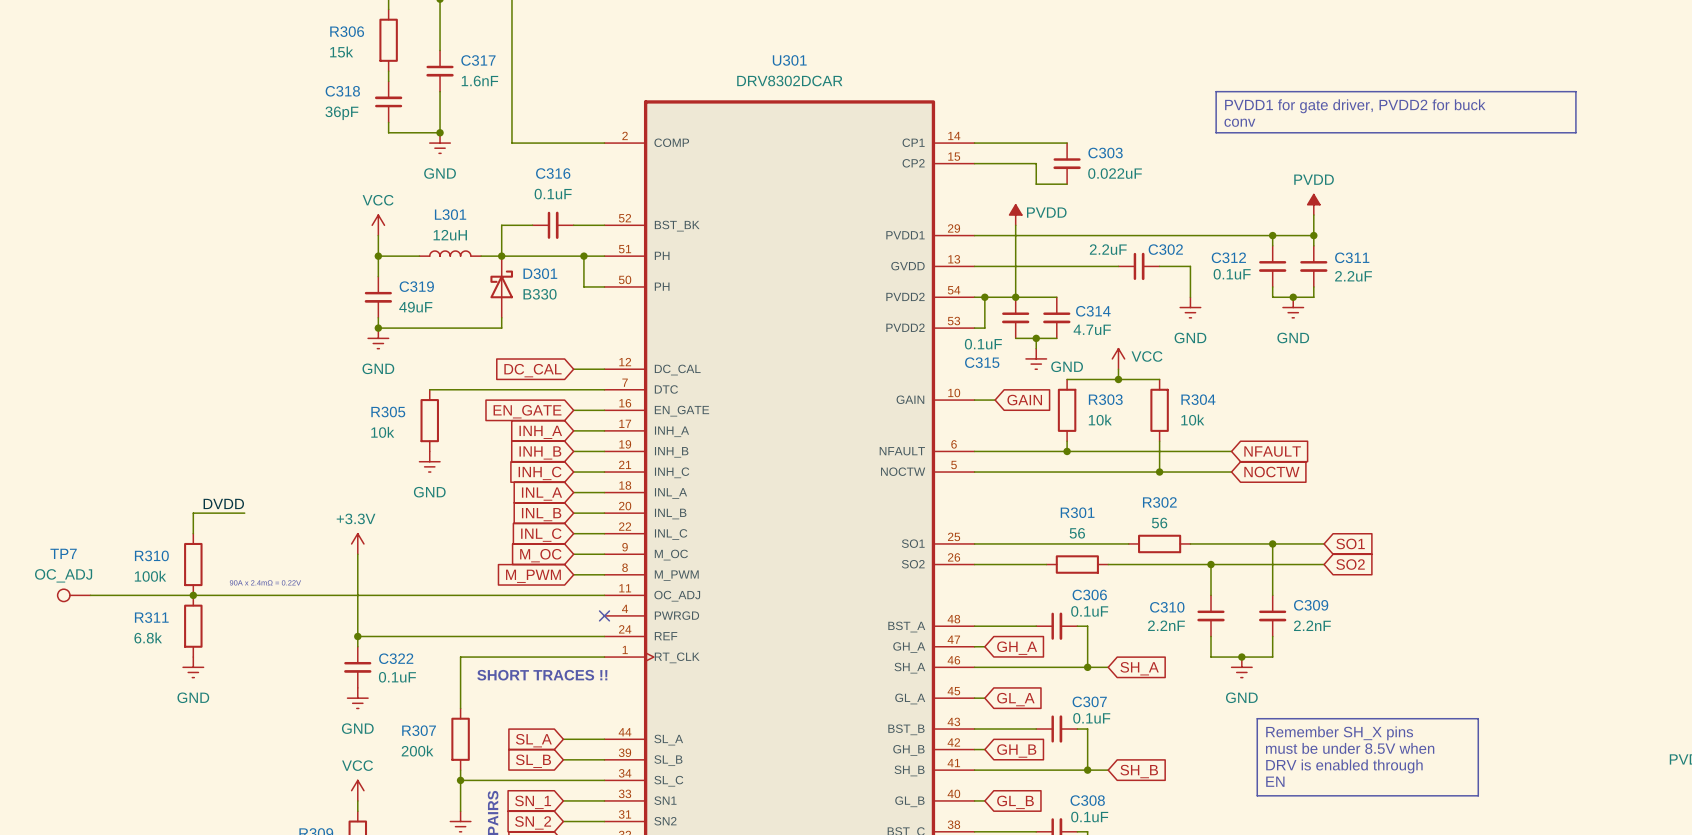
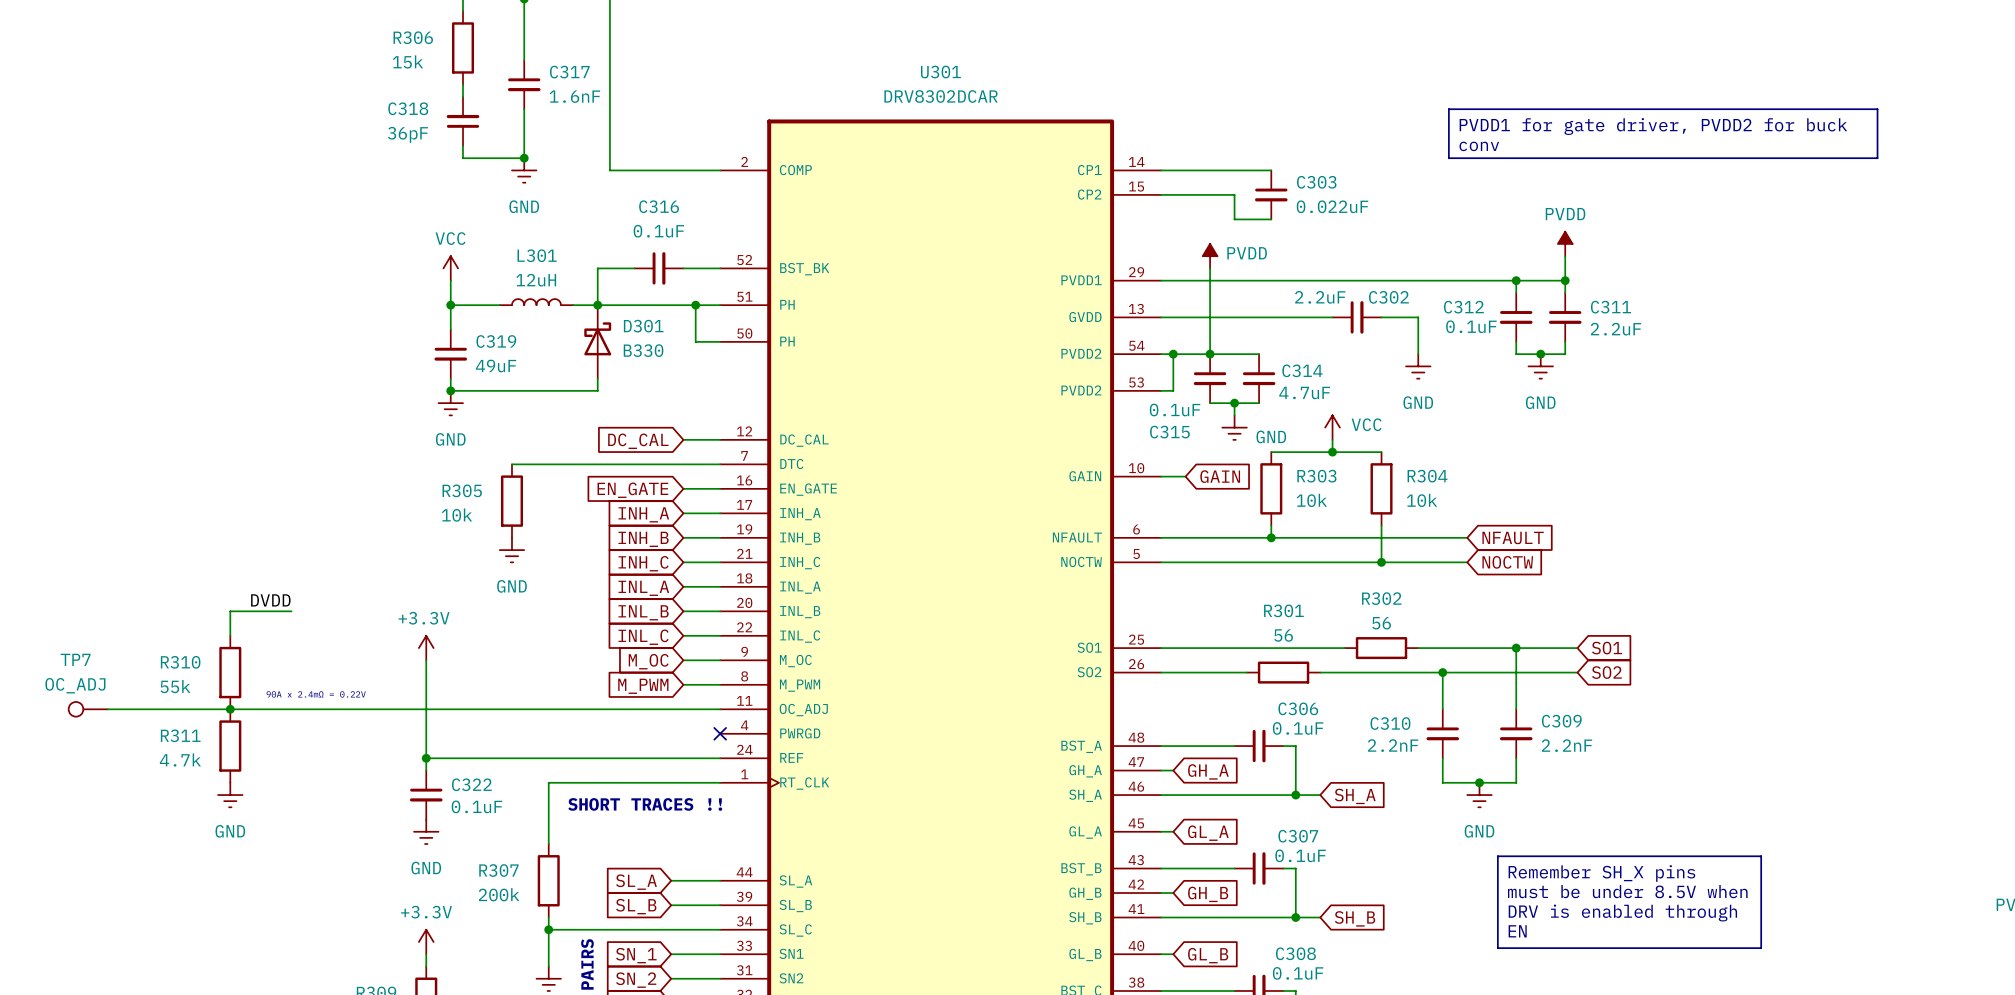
R310 value: 100k (150, 576) -> 55k (175, 686)
R311 value: 6.8k (148, 637) -> 4.7k (180, 760)
power symbol: VCC (357, 790) -> +3.3V (426, 942)

